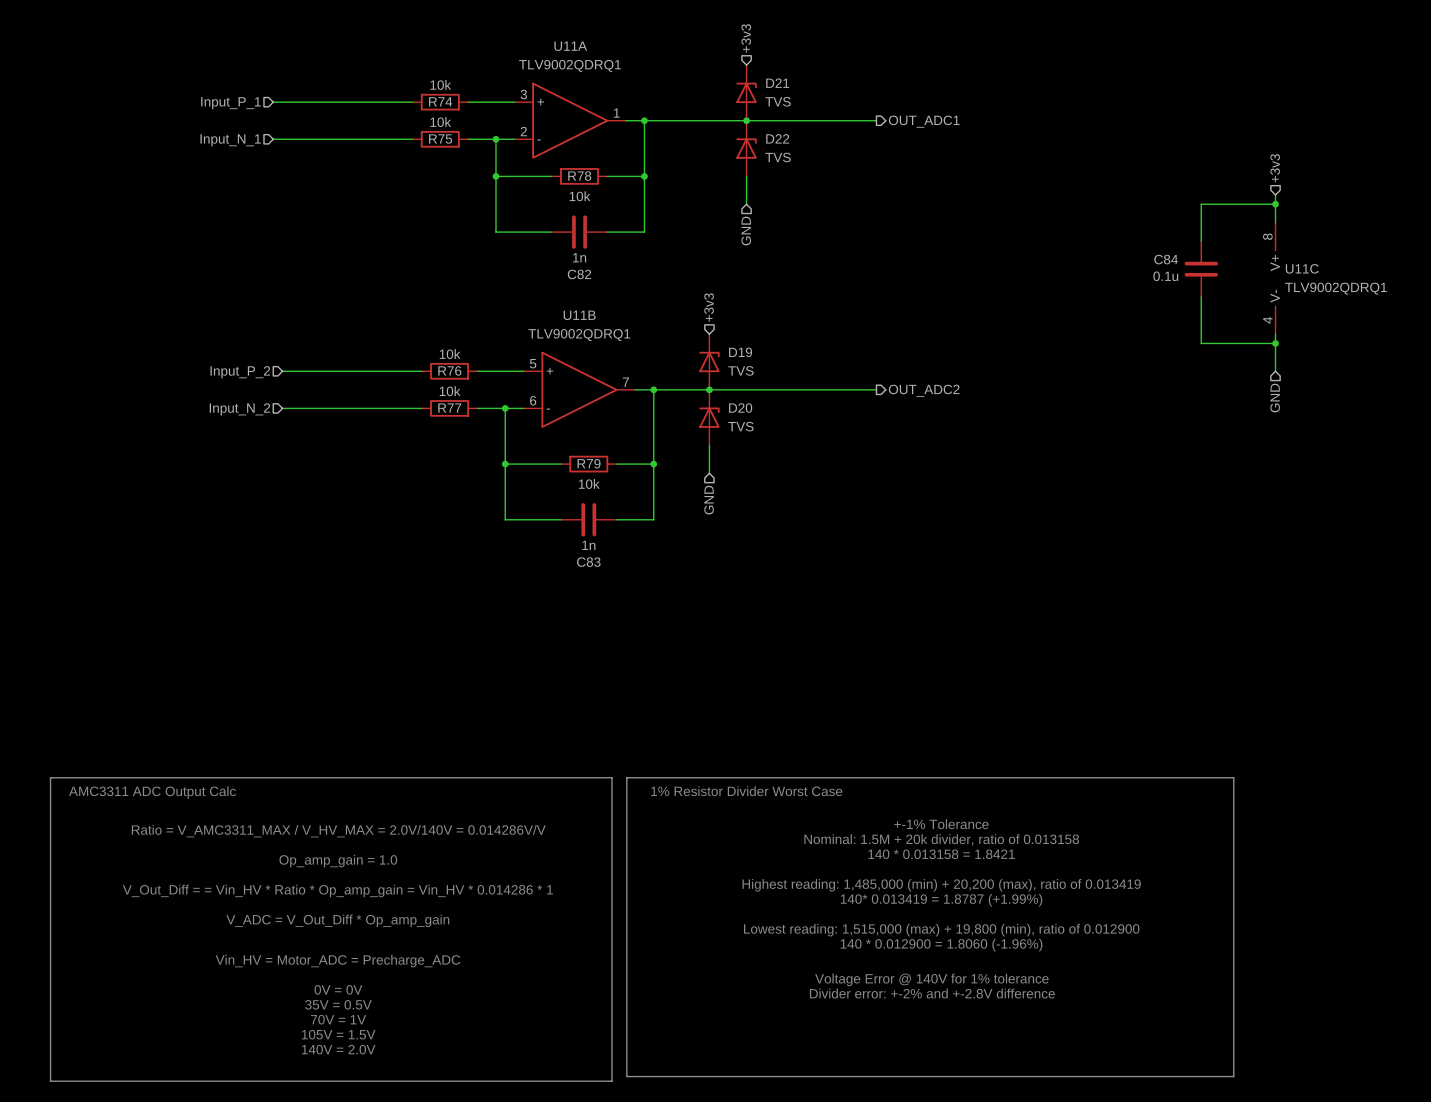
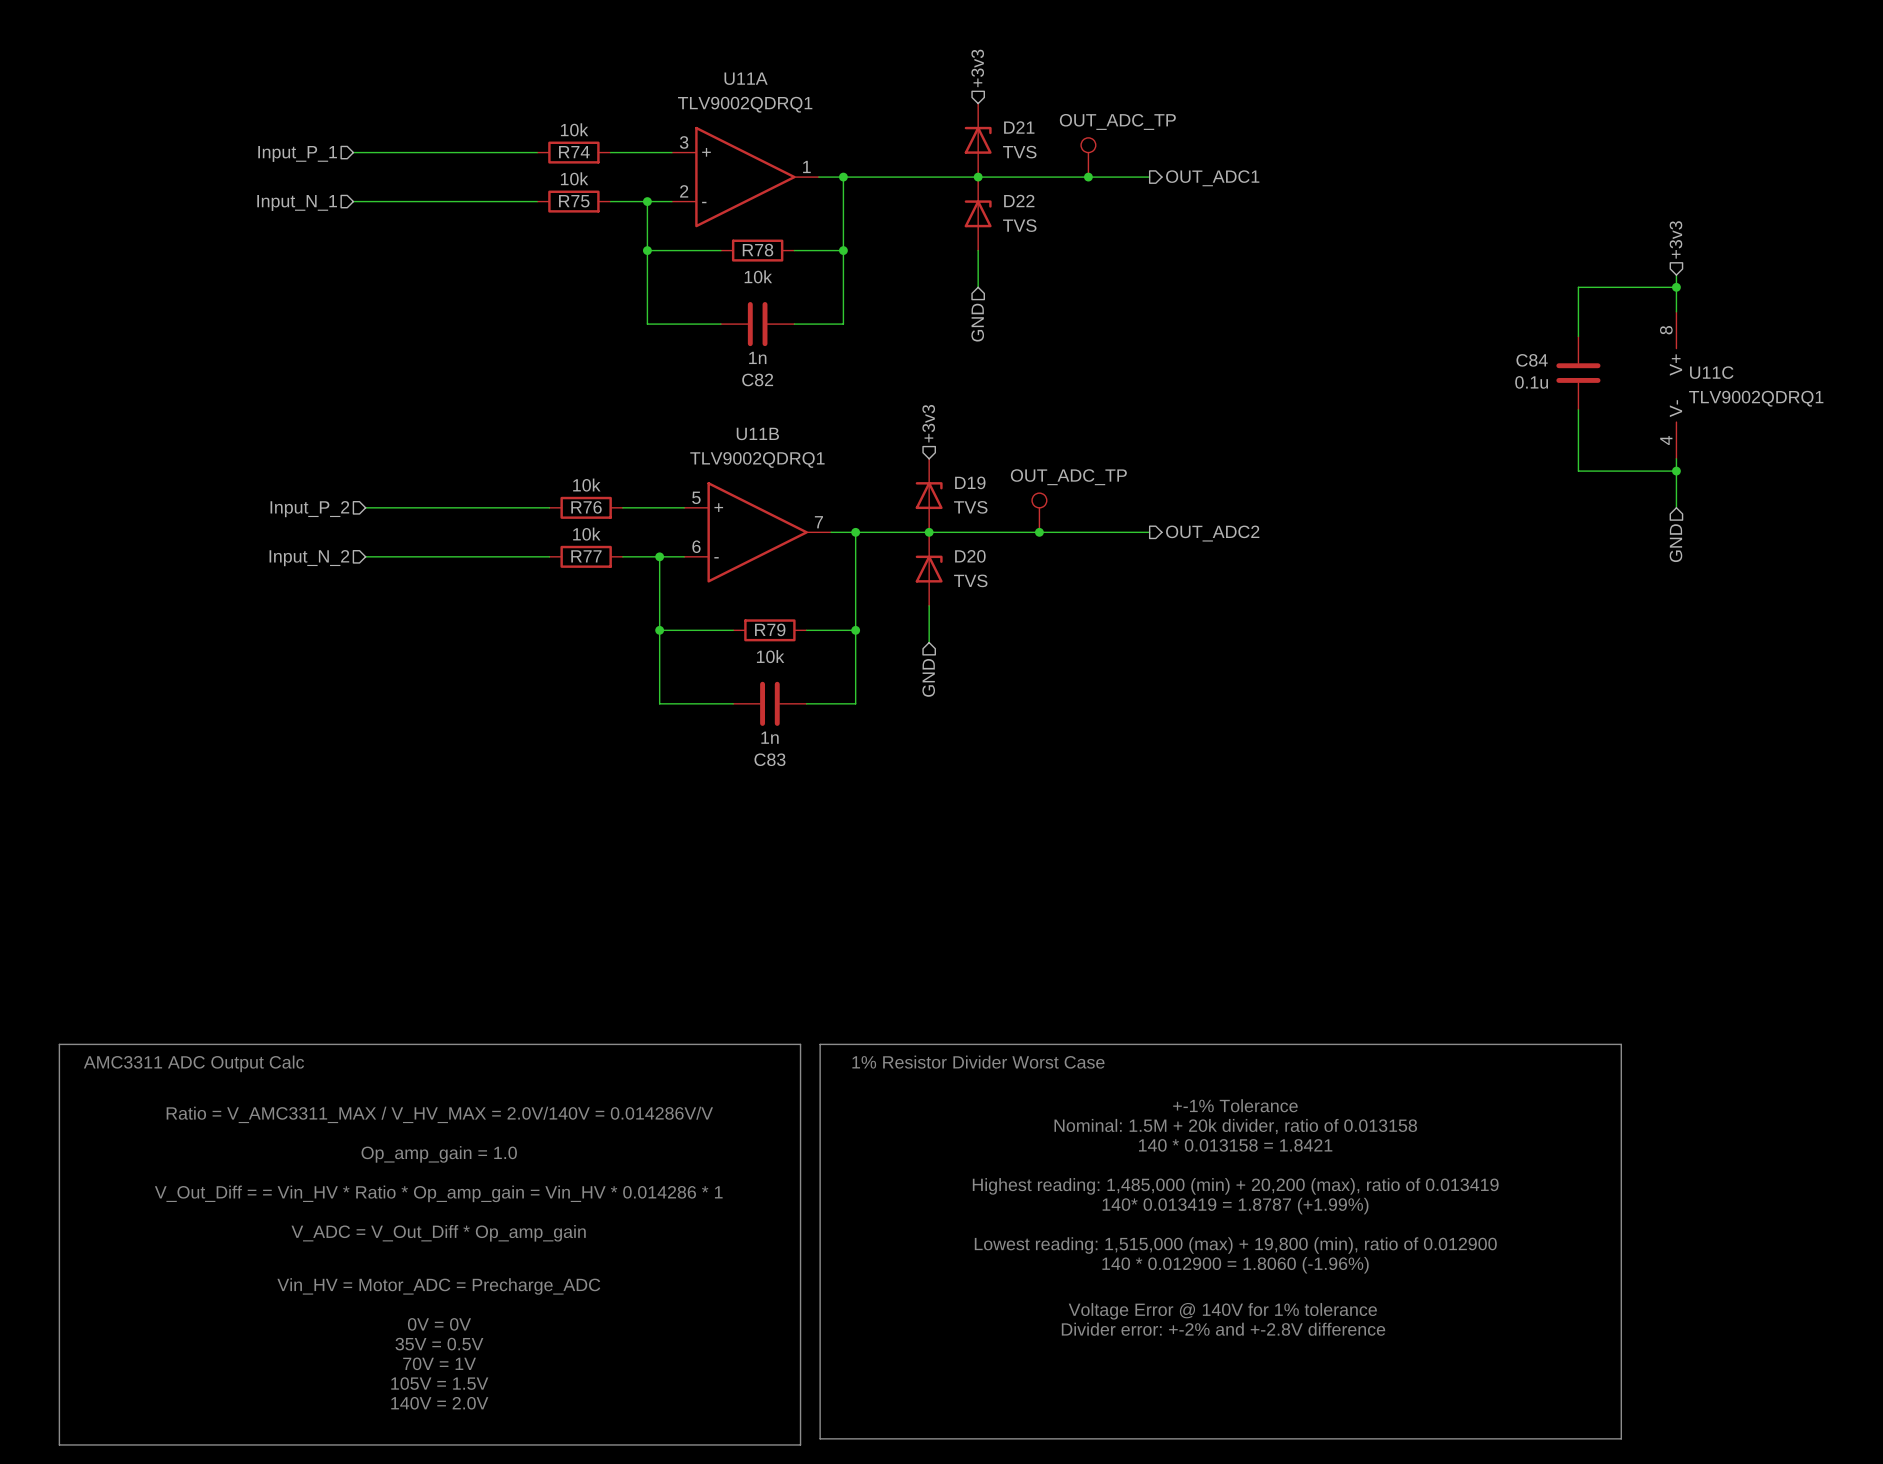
part: none -> OUT_ADC_TP (1088, 157)
junction: none -> (1088, 177)
part: none -> OUT_ADC_TP (1039, 512)
junction: none -> (1039, 532)

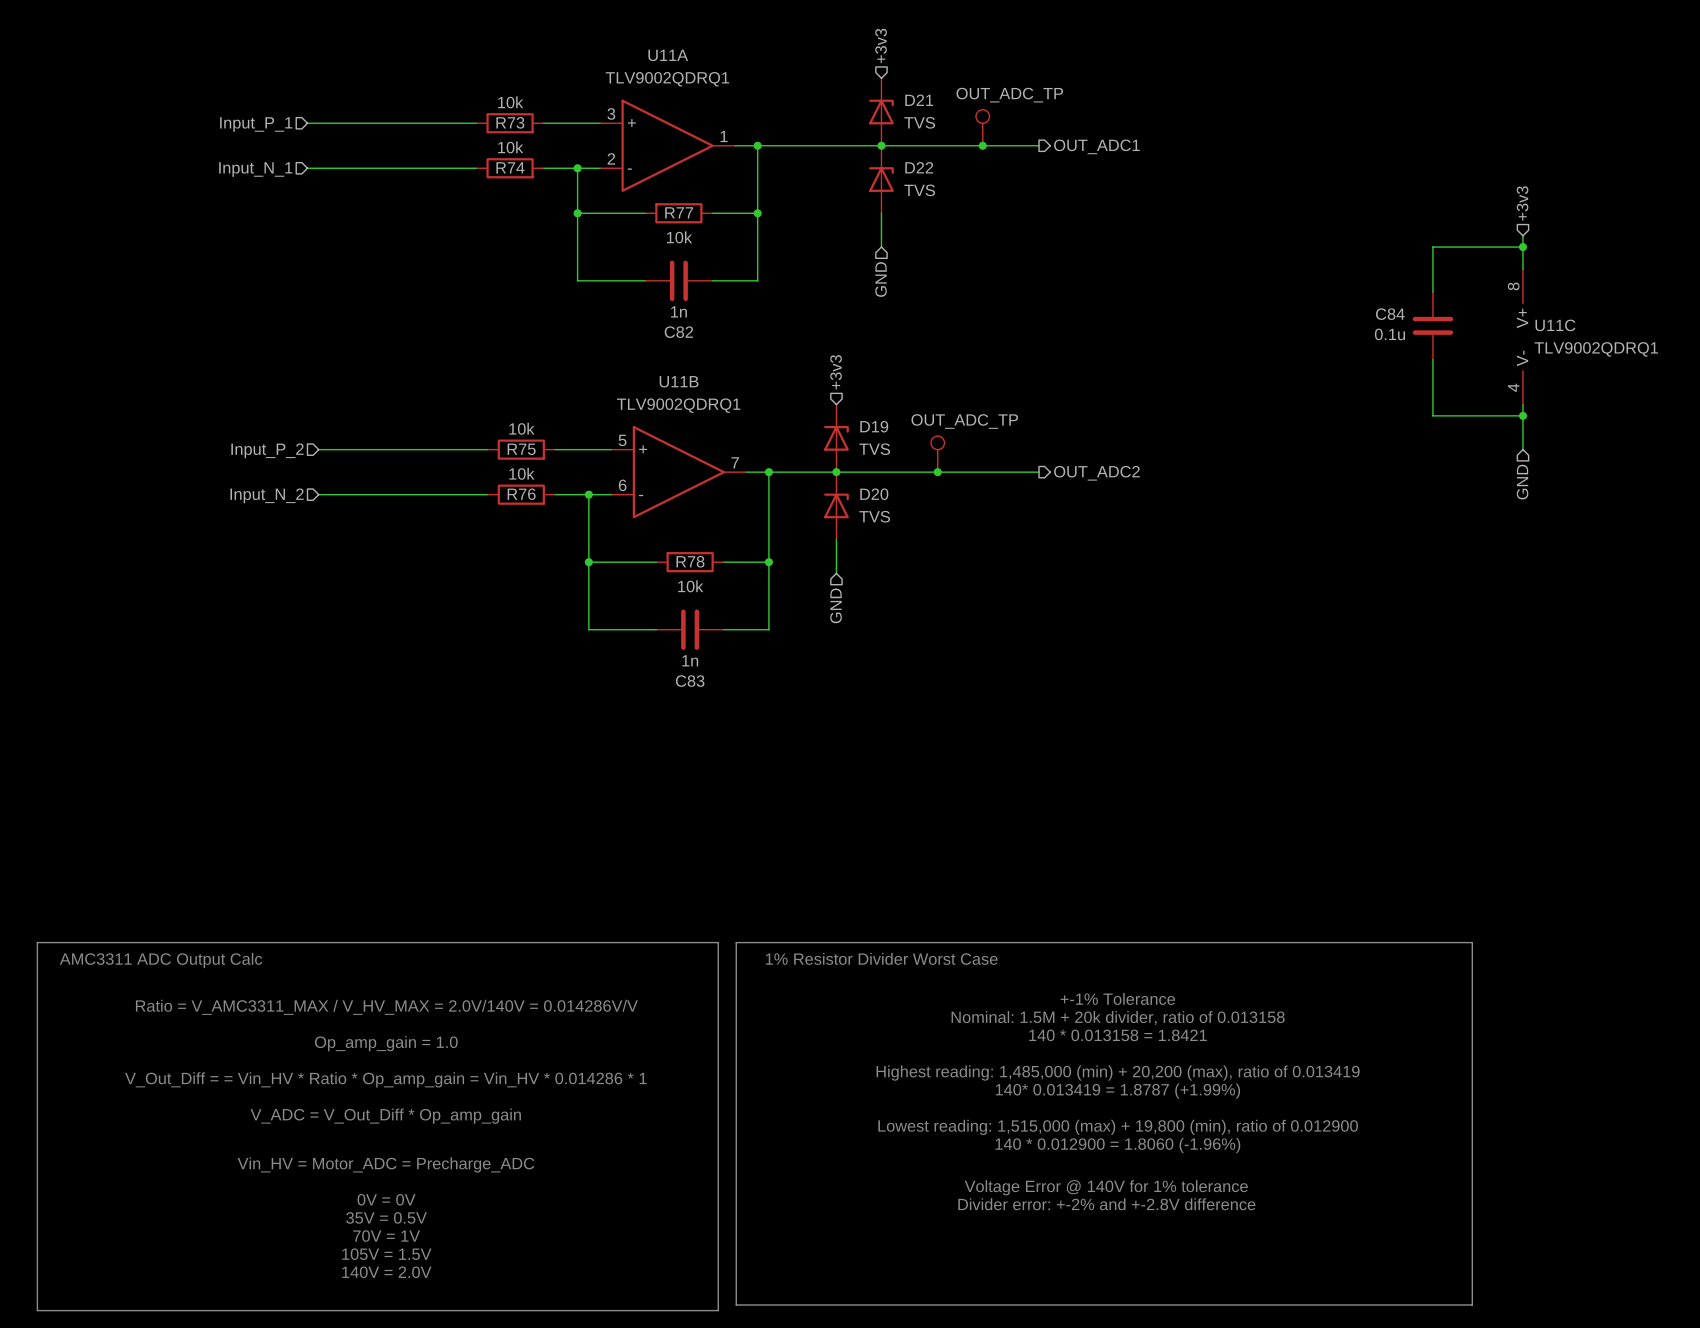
R74 name: R74 (574, 152) -> R73 (510, 122)
R75 name: R75 (574, 201) -> R74 (510, 167)
R78 name: R78 (758, 250) -> R77 (679, 212)
R76 name: R76 (586, 507) -> R75 (521, 449)
R77 name: R77 (586, 556) -> R76 (521, 494)
R79 name: R79 (770, 629) -> R78 (690, 561)

